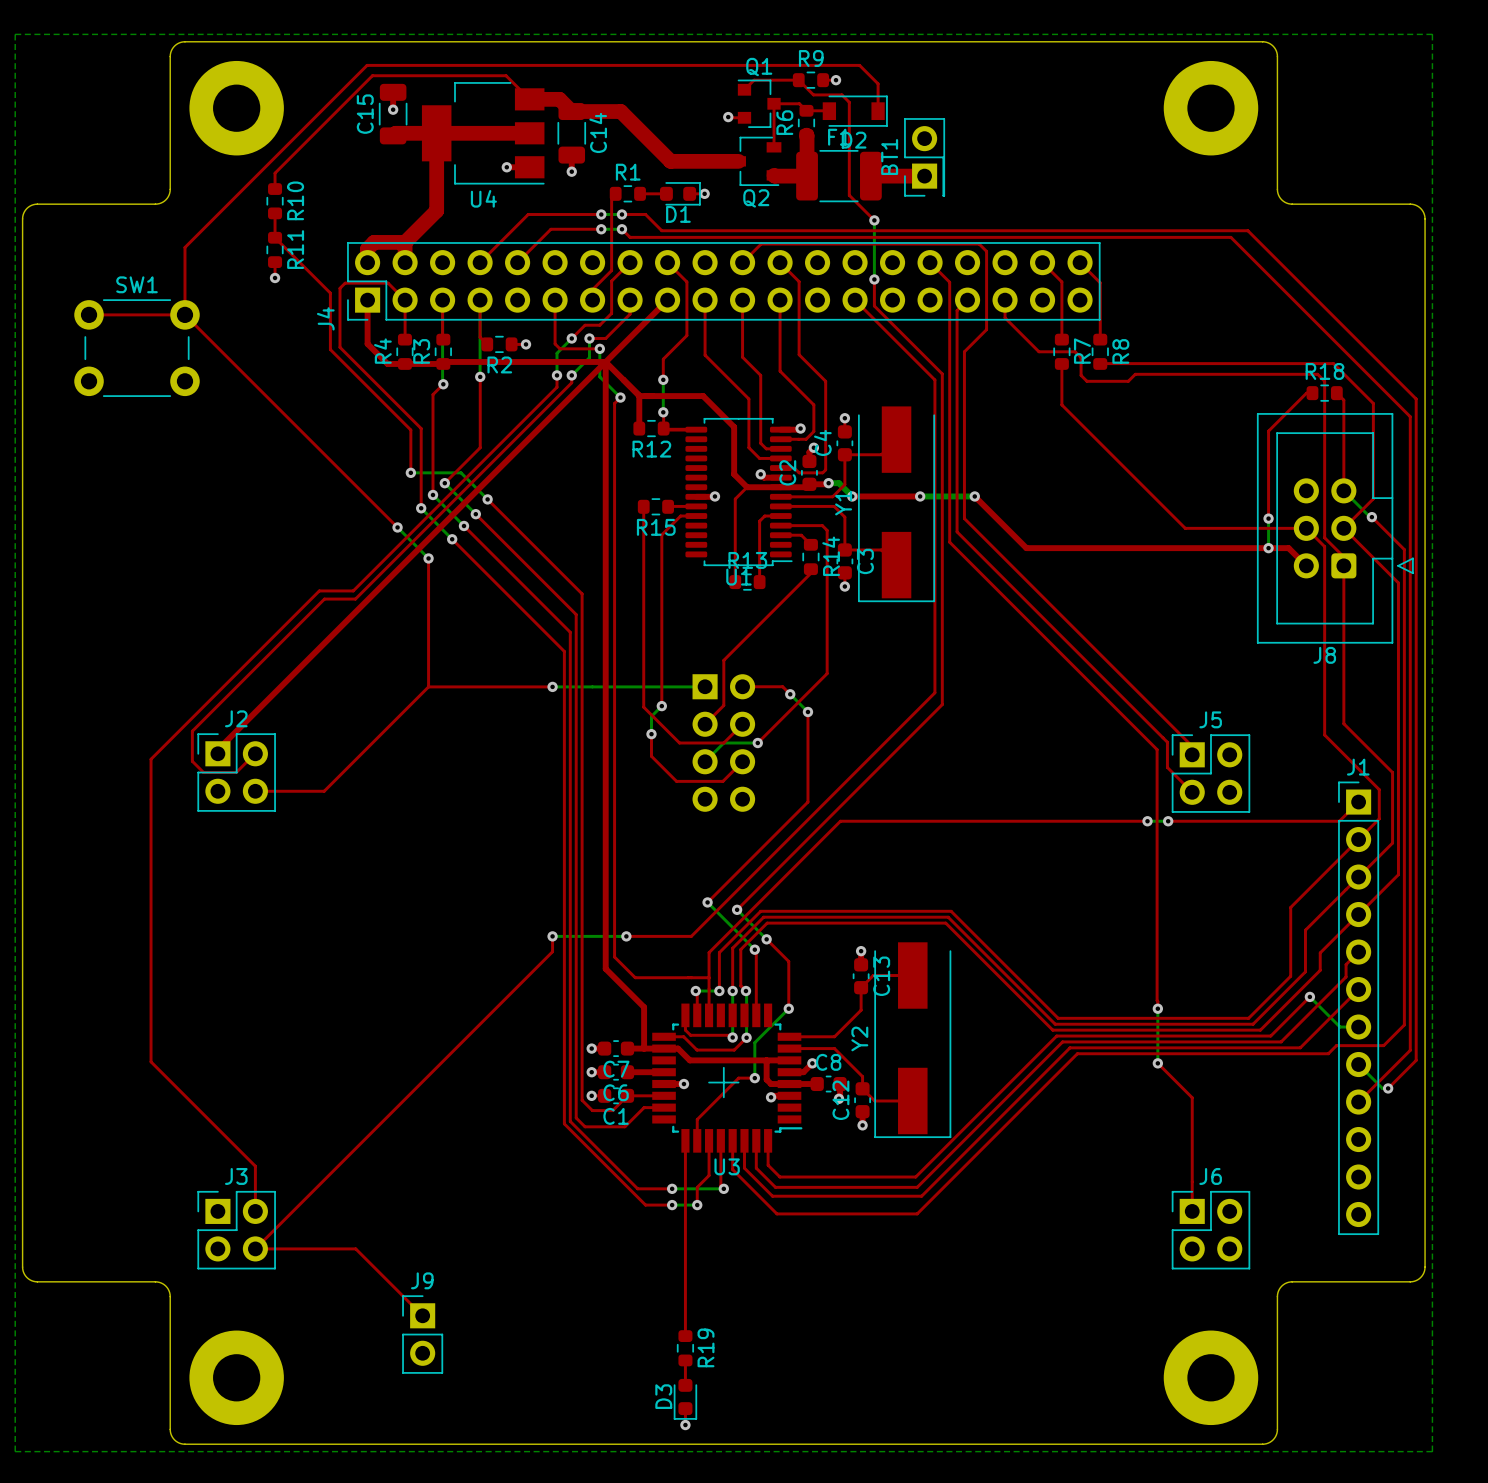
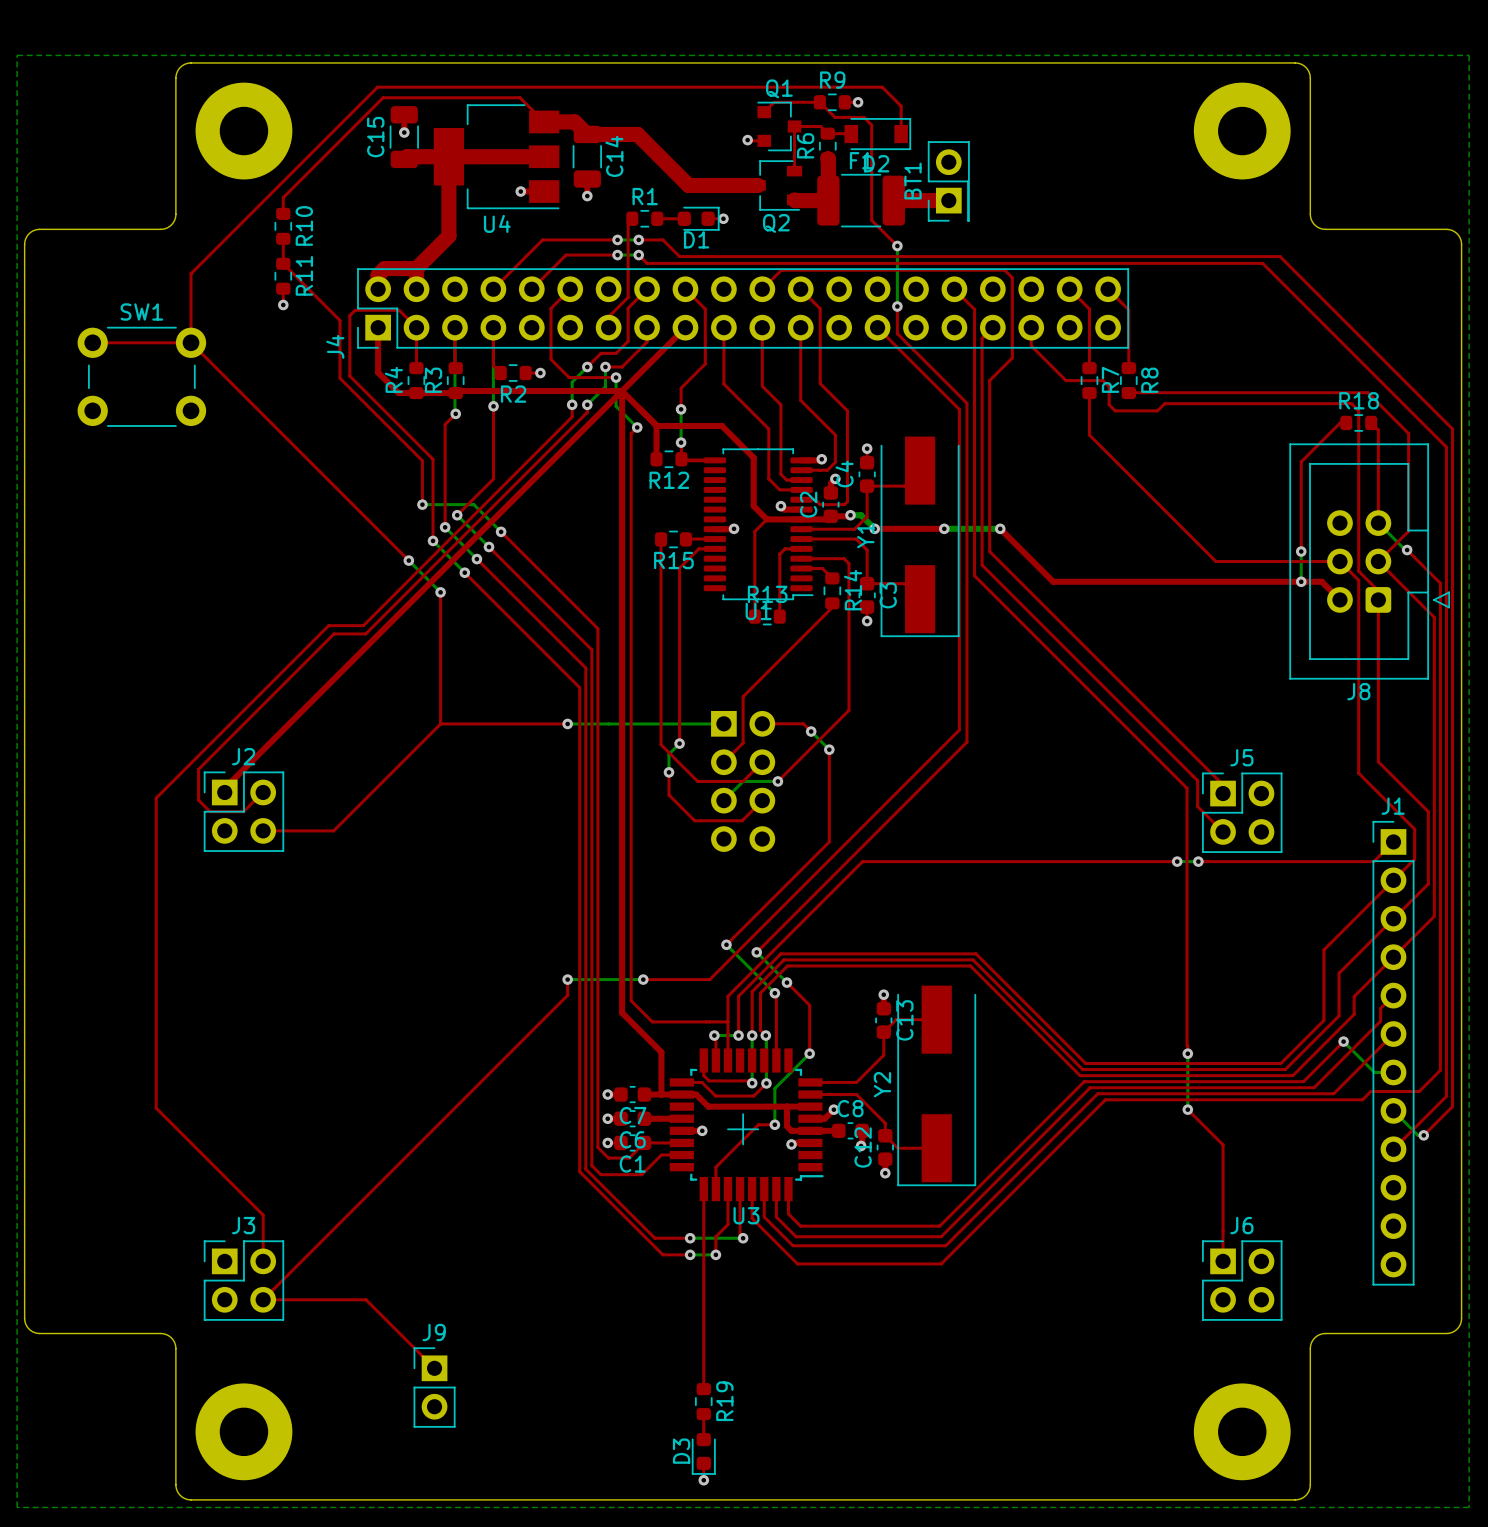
top track: (555, 300) (555, 343) (559, 348) -> (570, 289) (551, 308) (551, 359) (569, 377) (575, 377)

